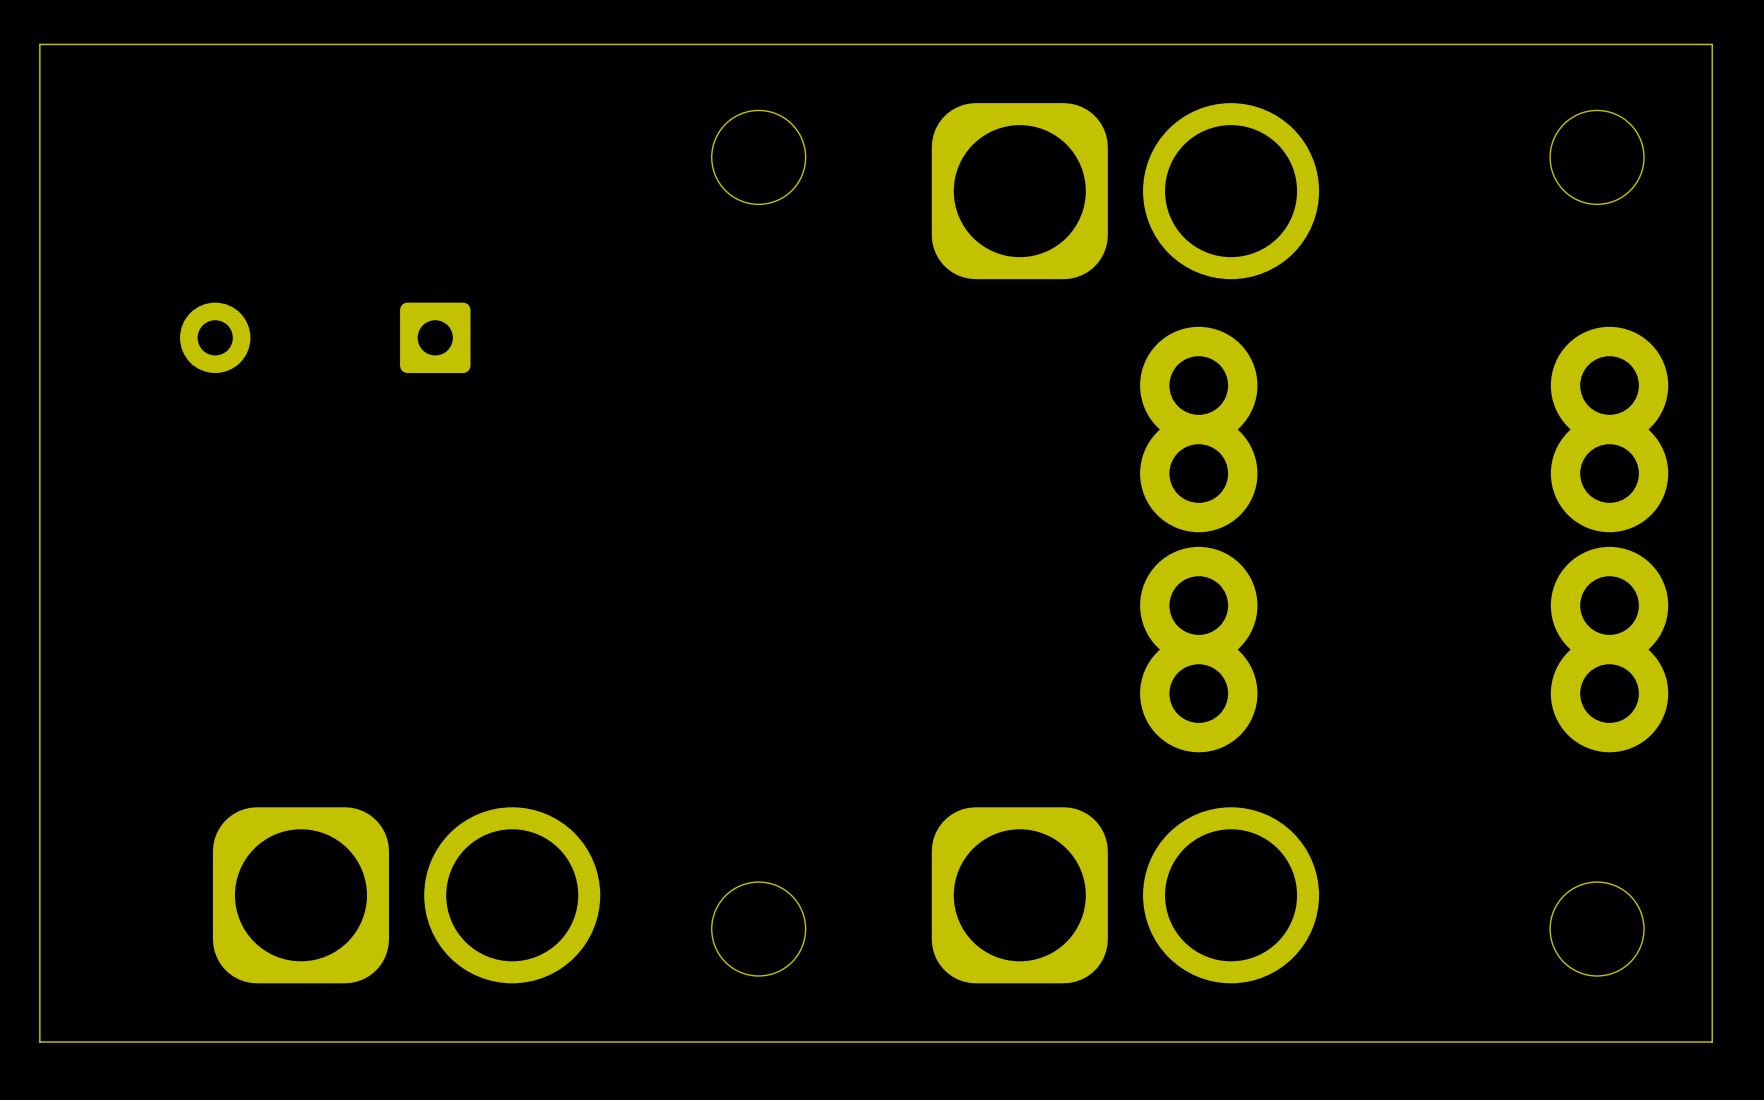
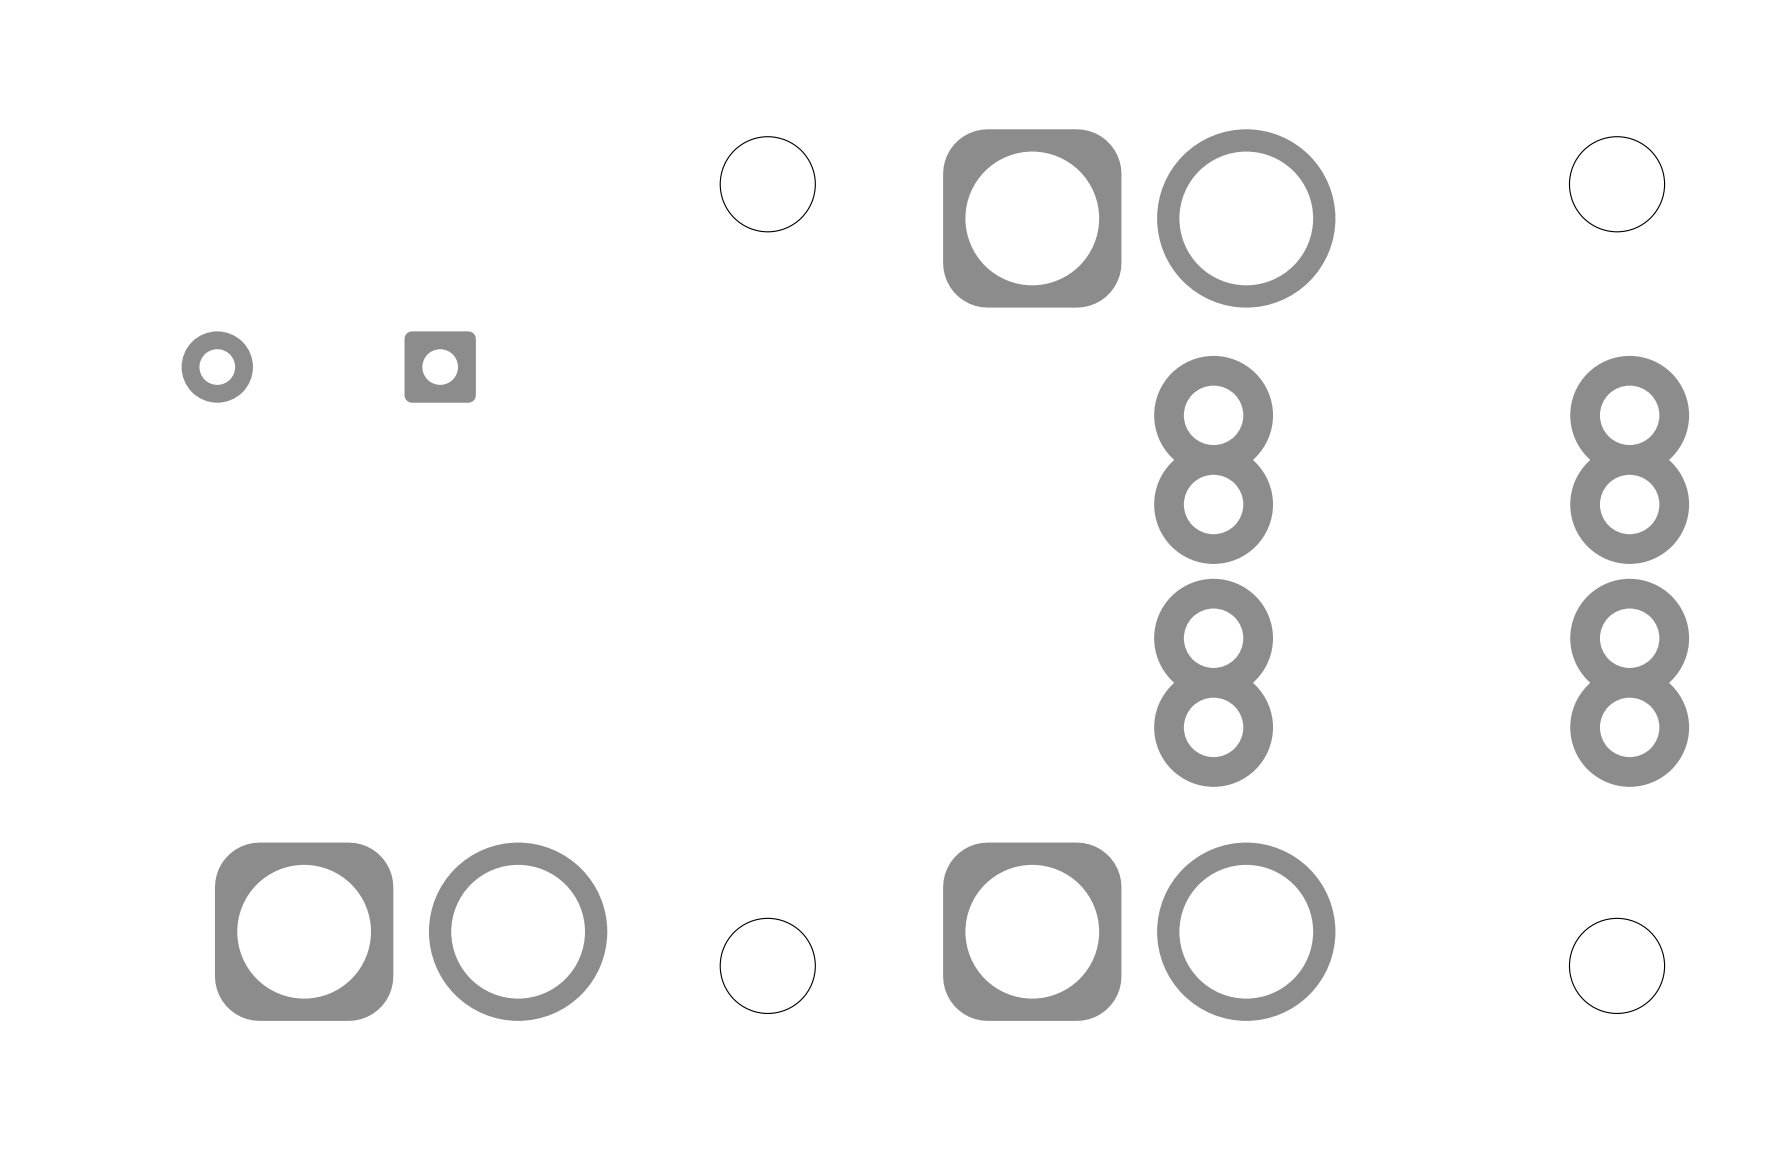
board edge: (1712, 44) (39, 44) (39, 1041) (1712, 1041) (1712, 44) -> none

